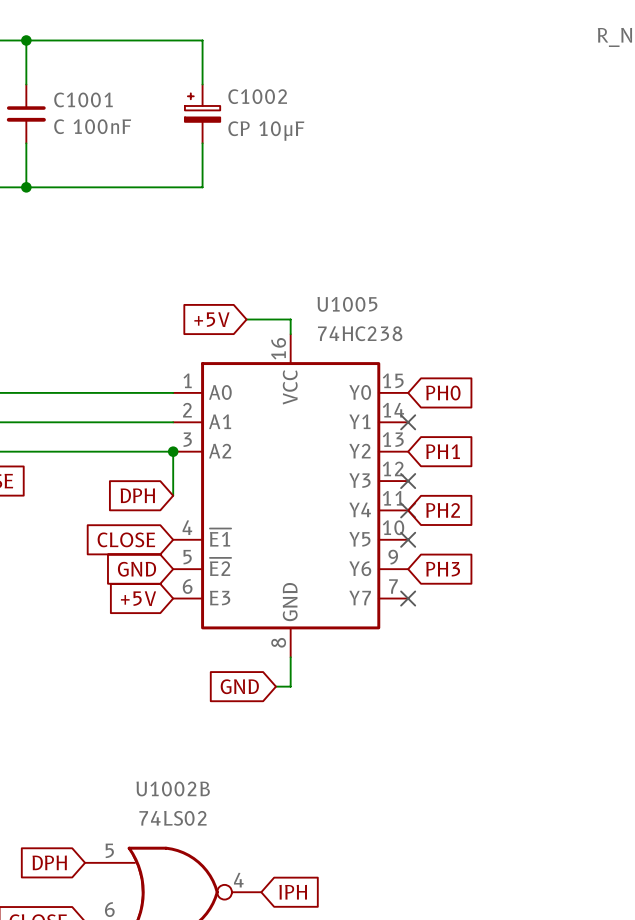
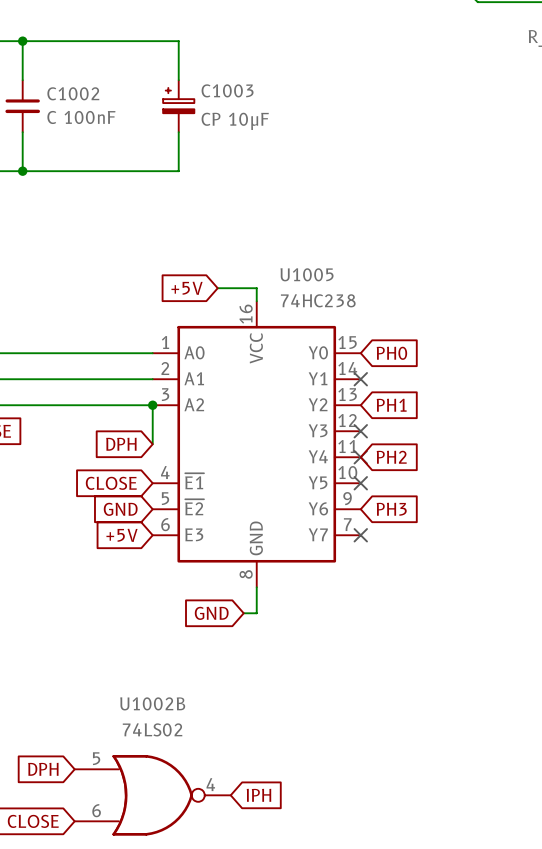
C1002 name: C1002 (257, 96) -> C1003 (227, 90)
C1001 name: C1001 (83, 99) -> C1002 (73, 93)

